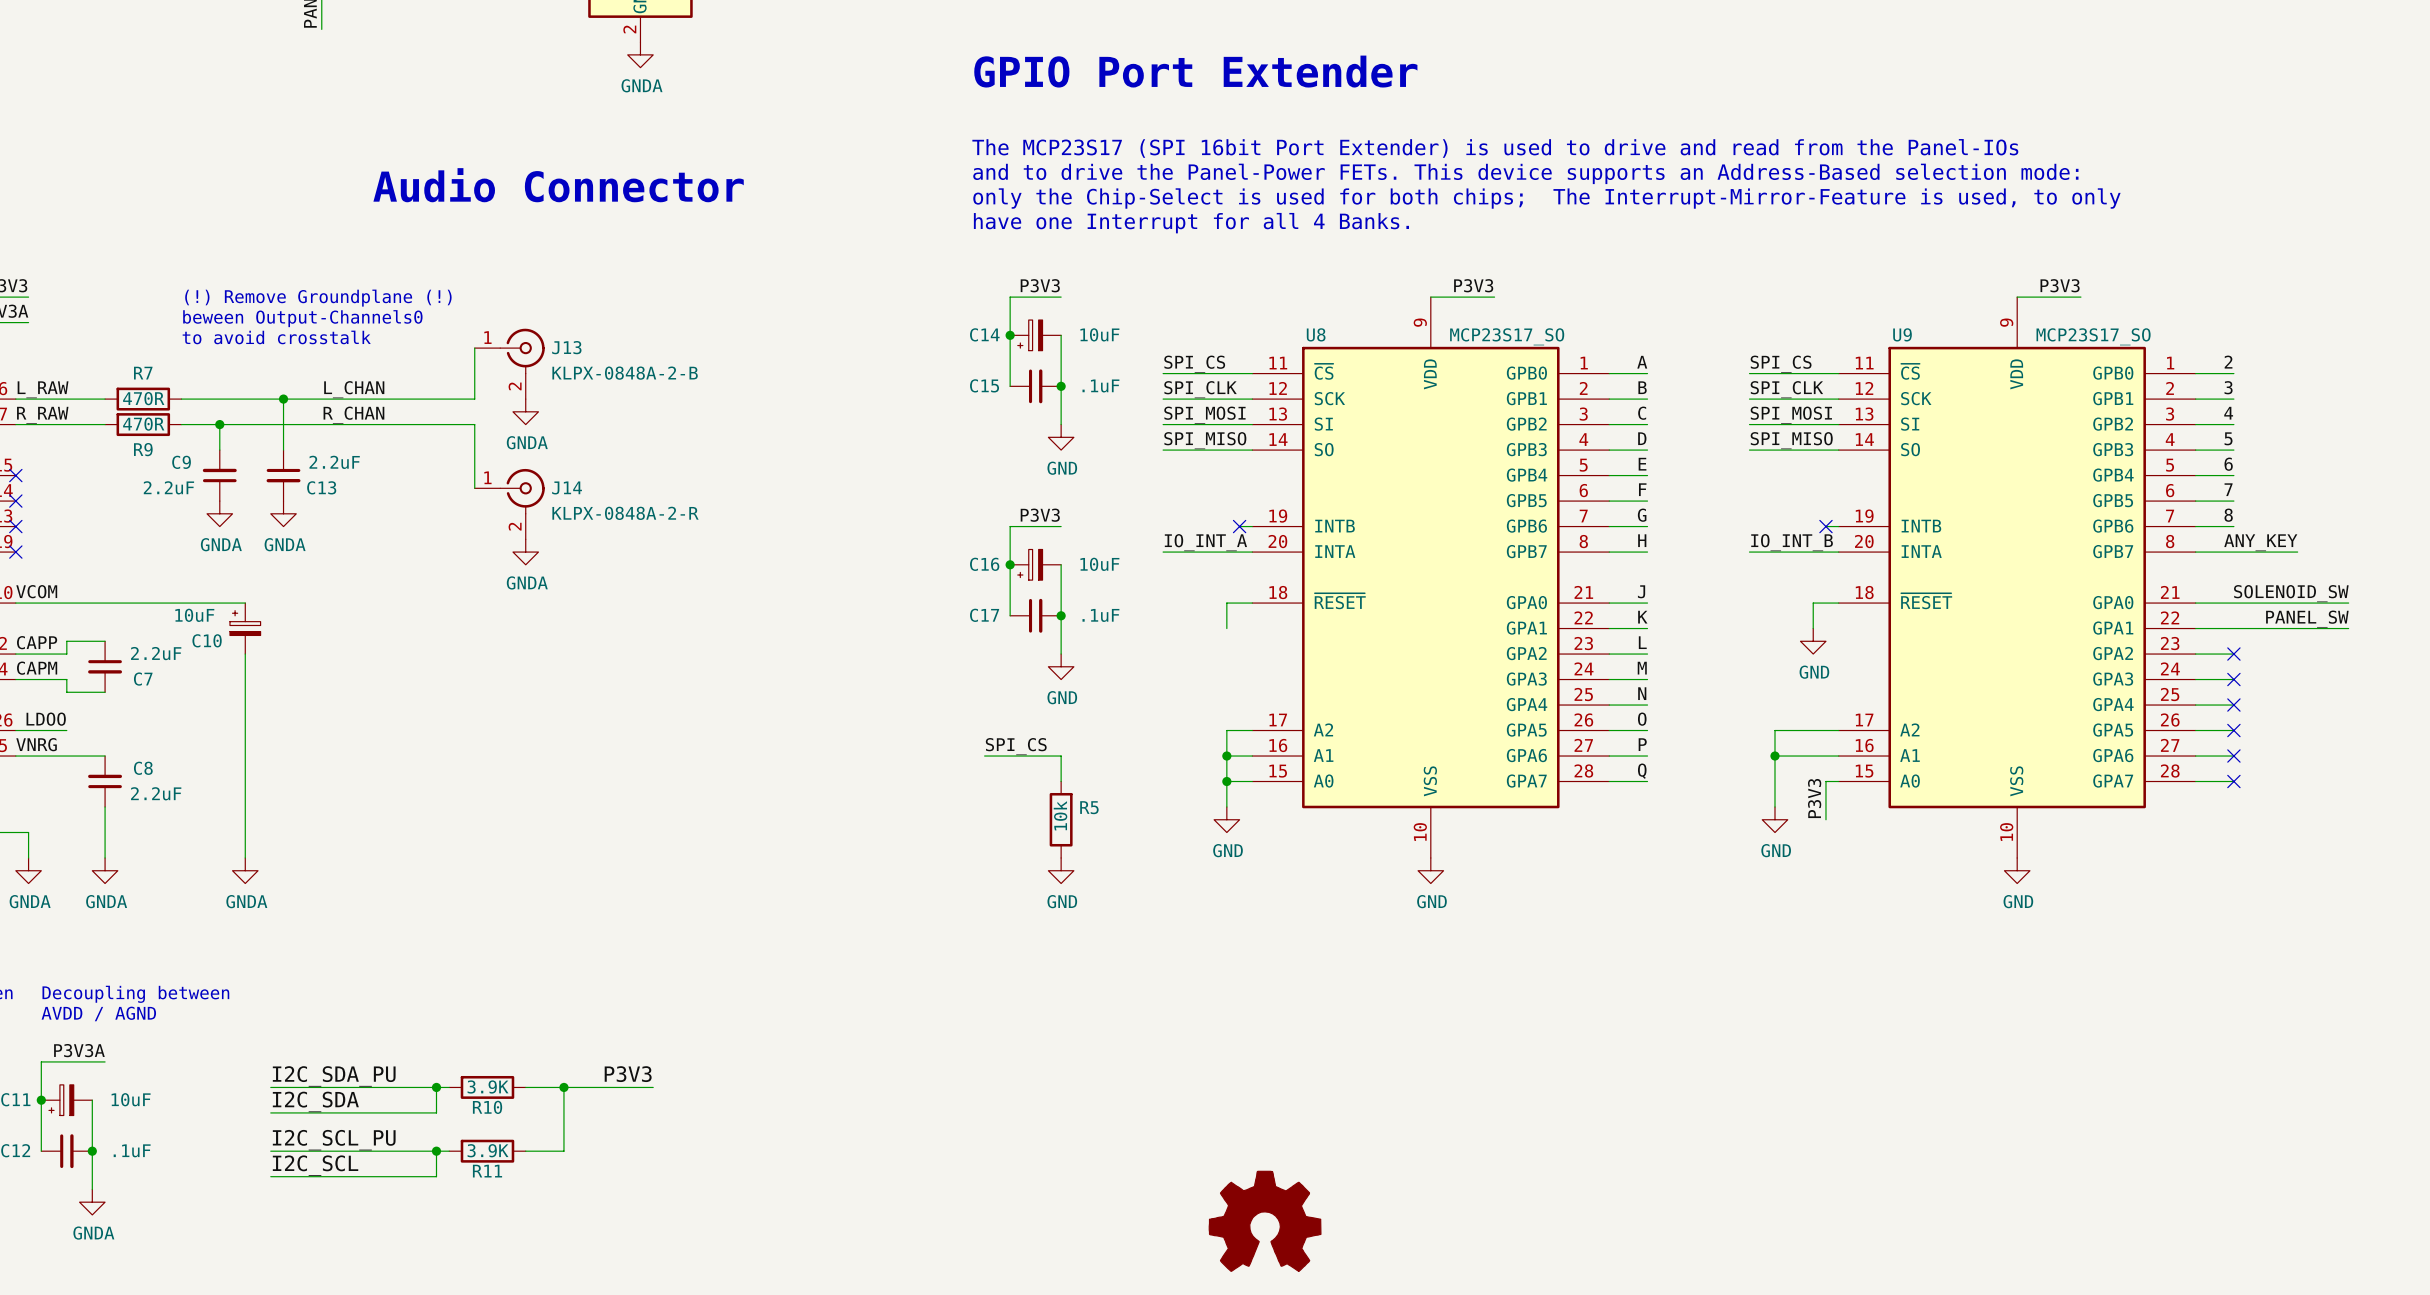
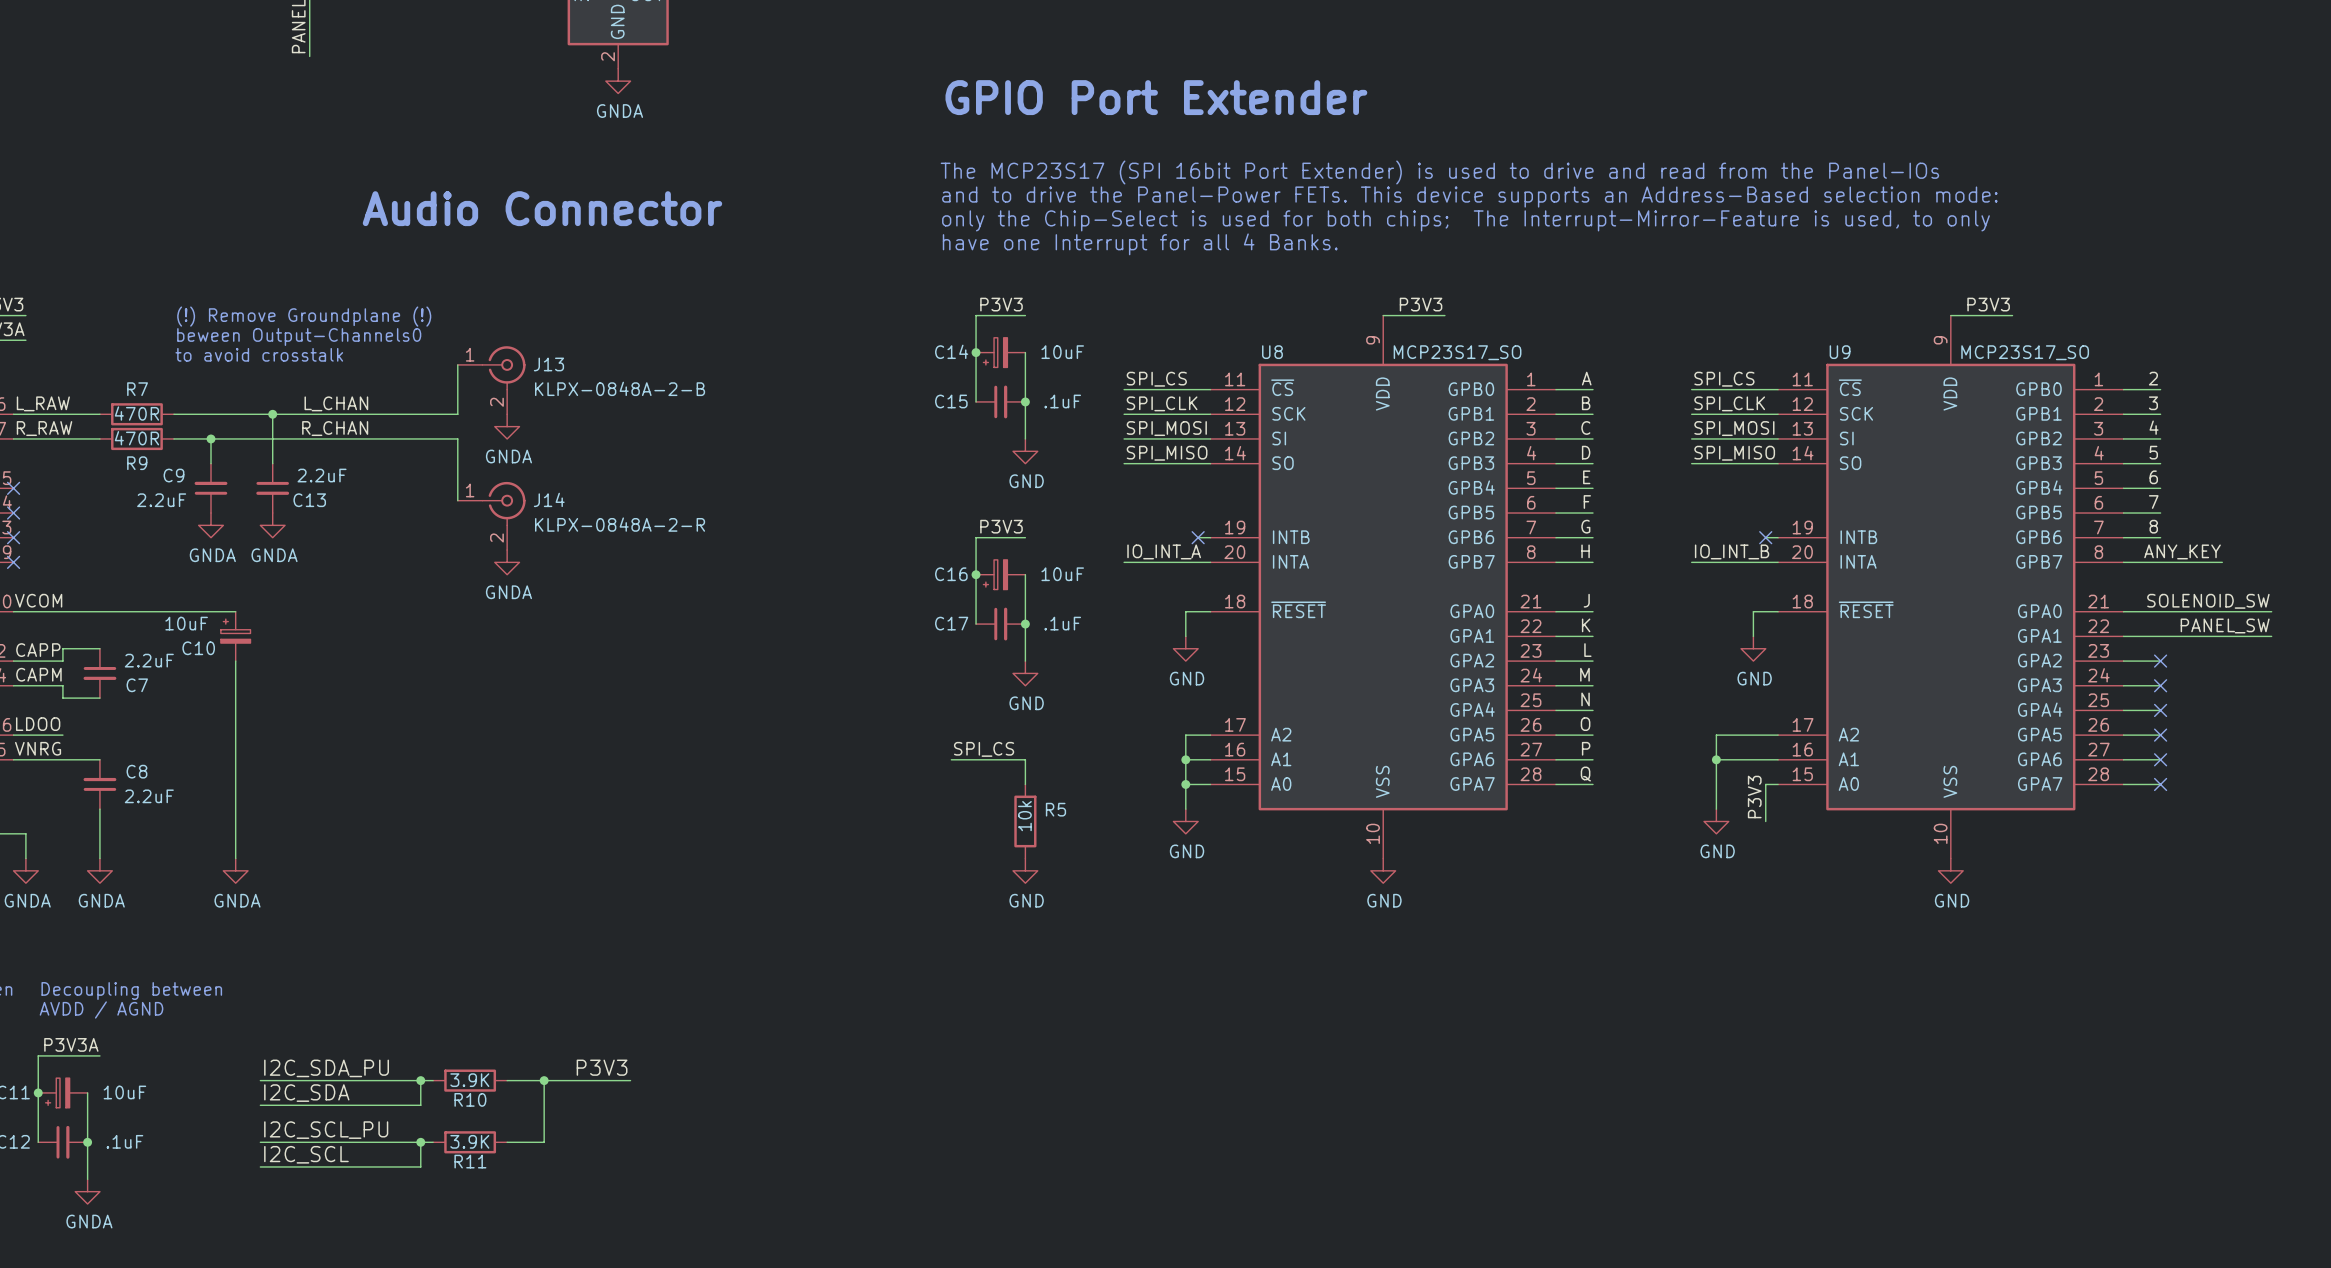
power symbol: none -> GND (1185, 648)
power symbol: (1265, 1221) -> none

